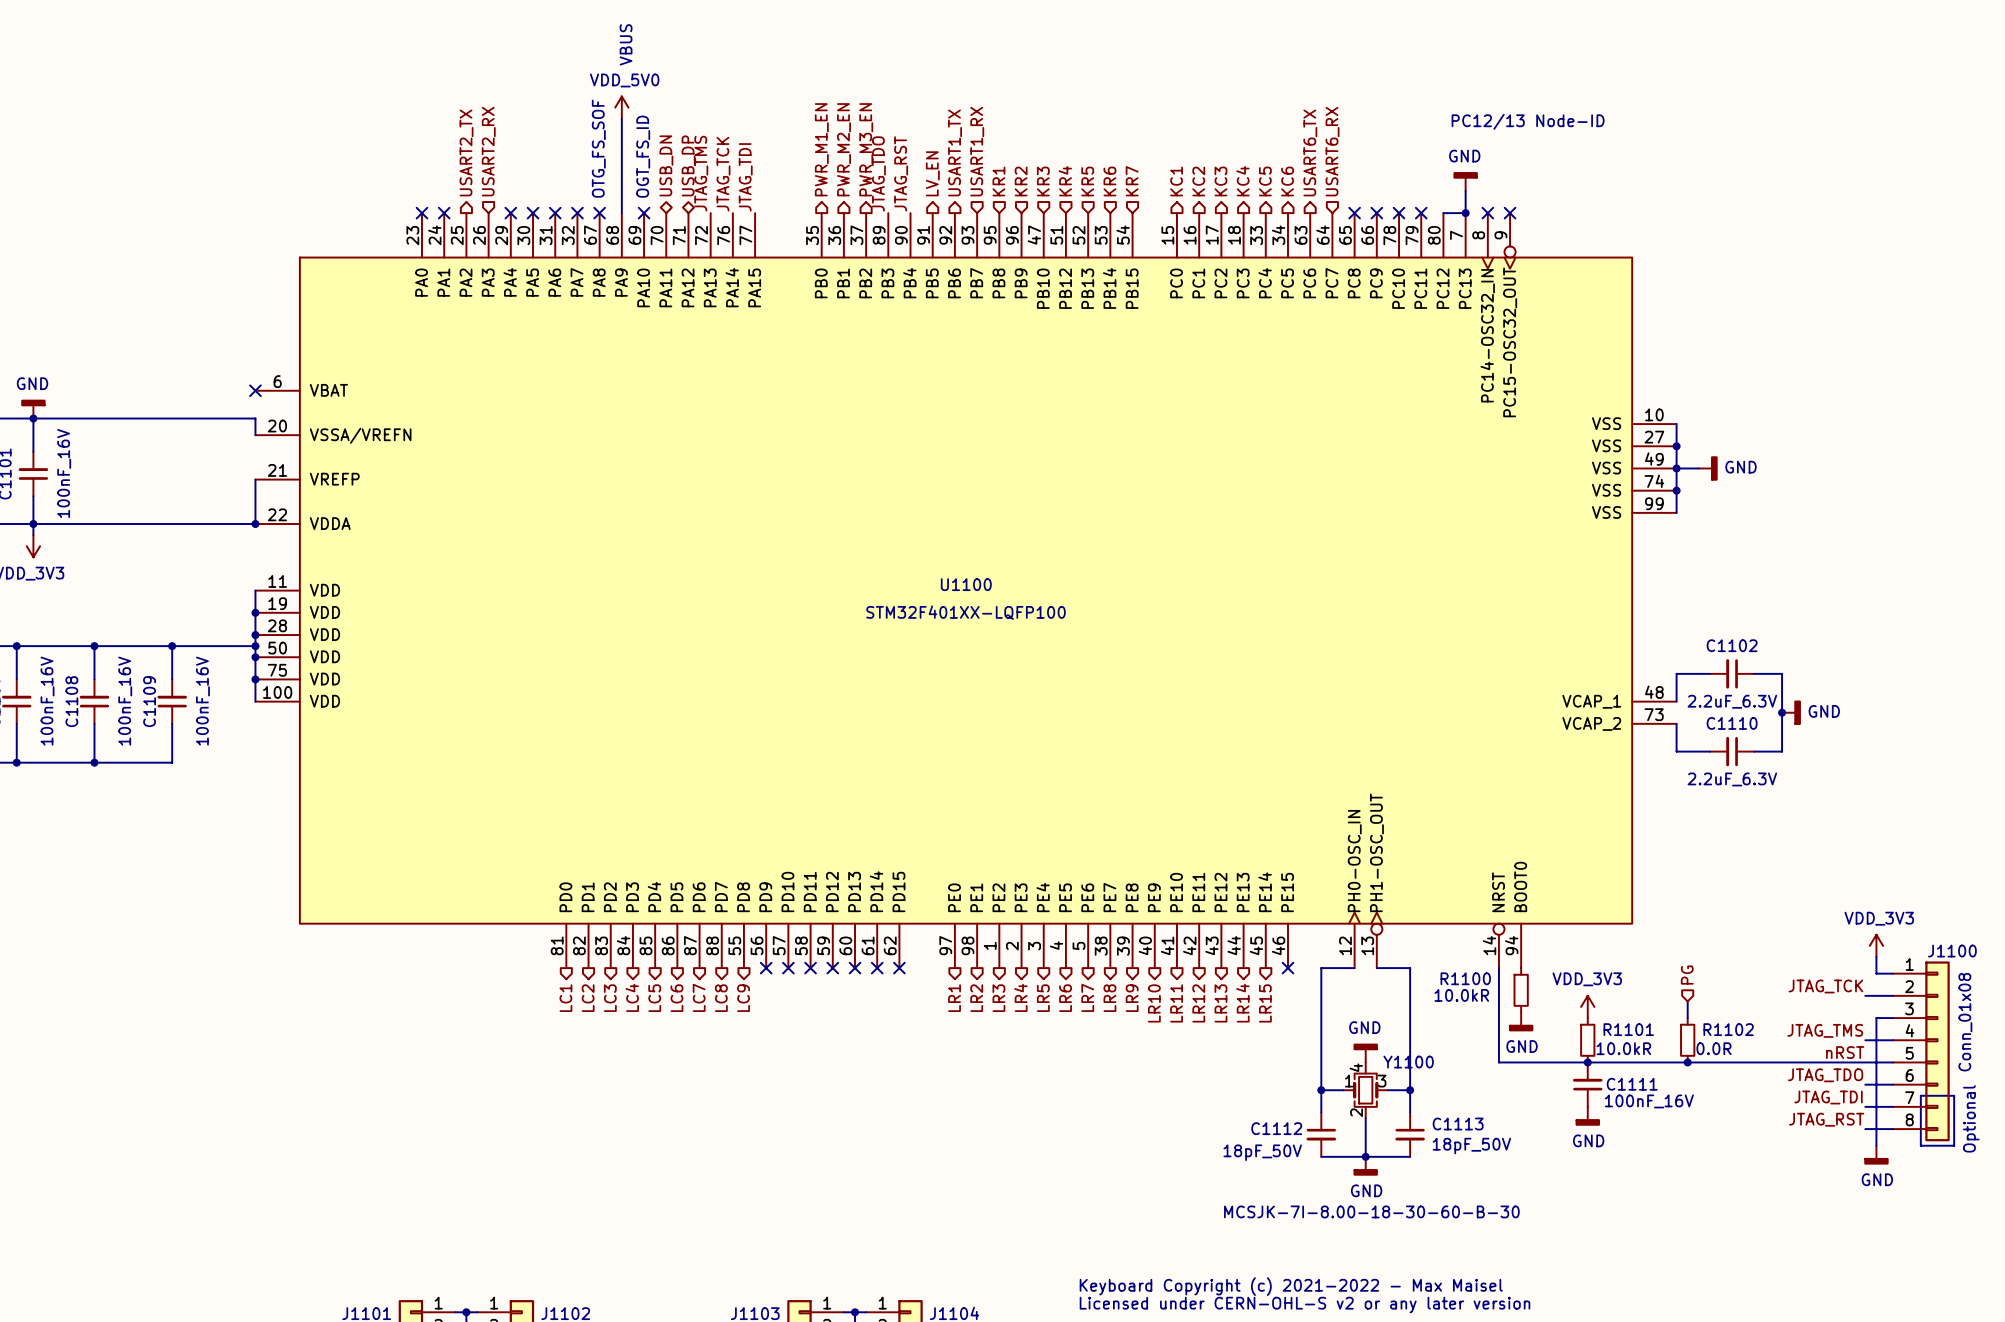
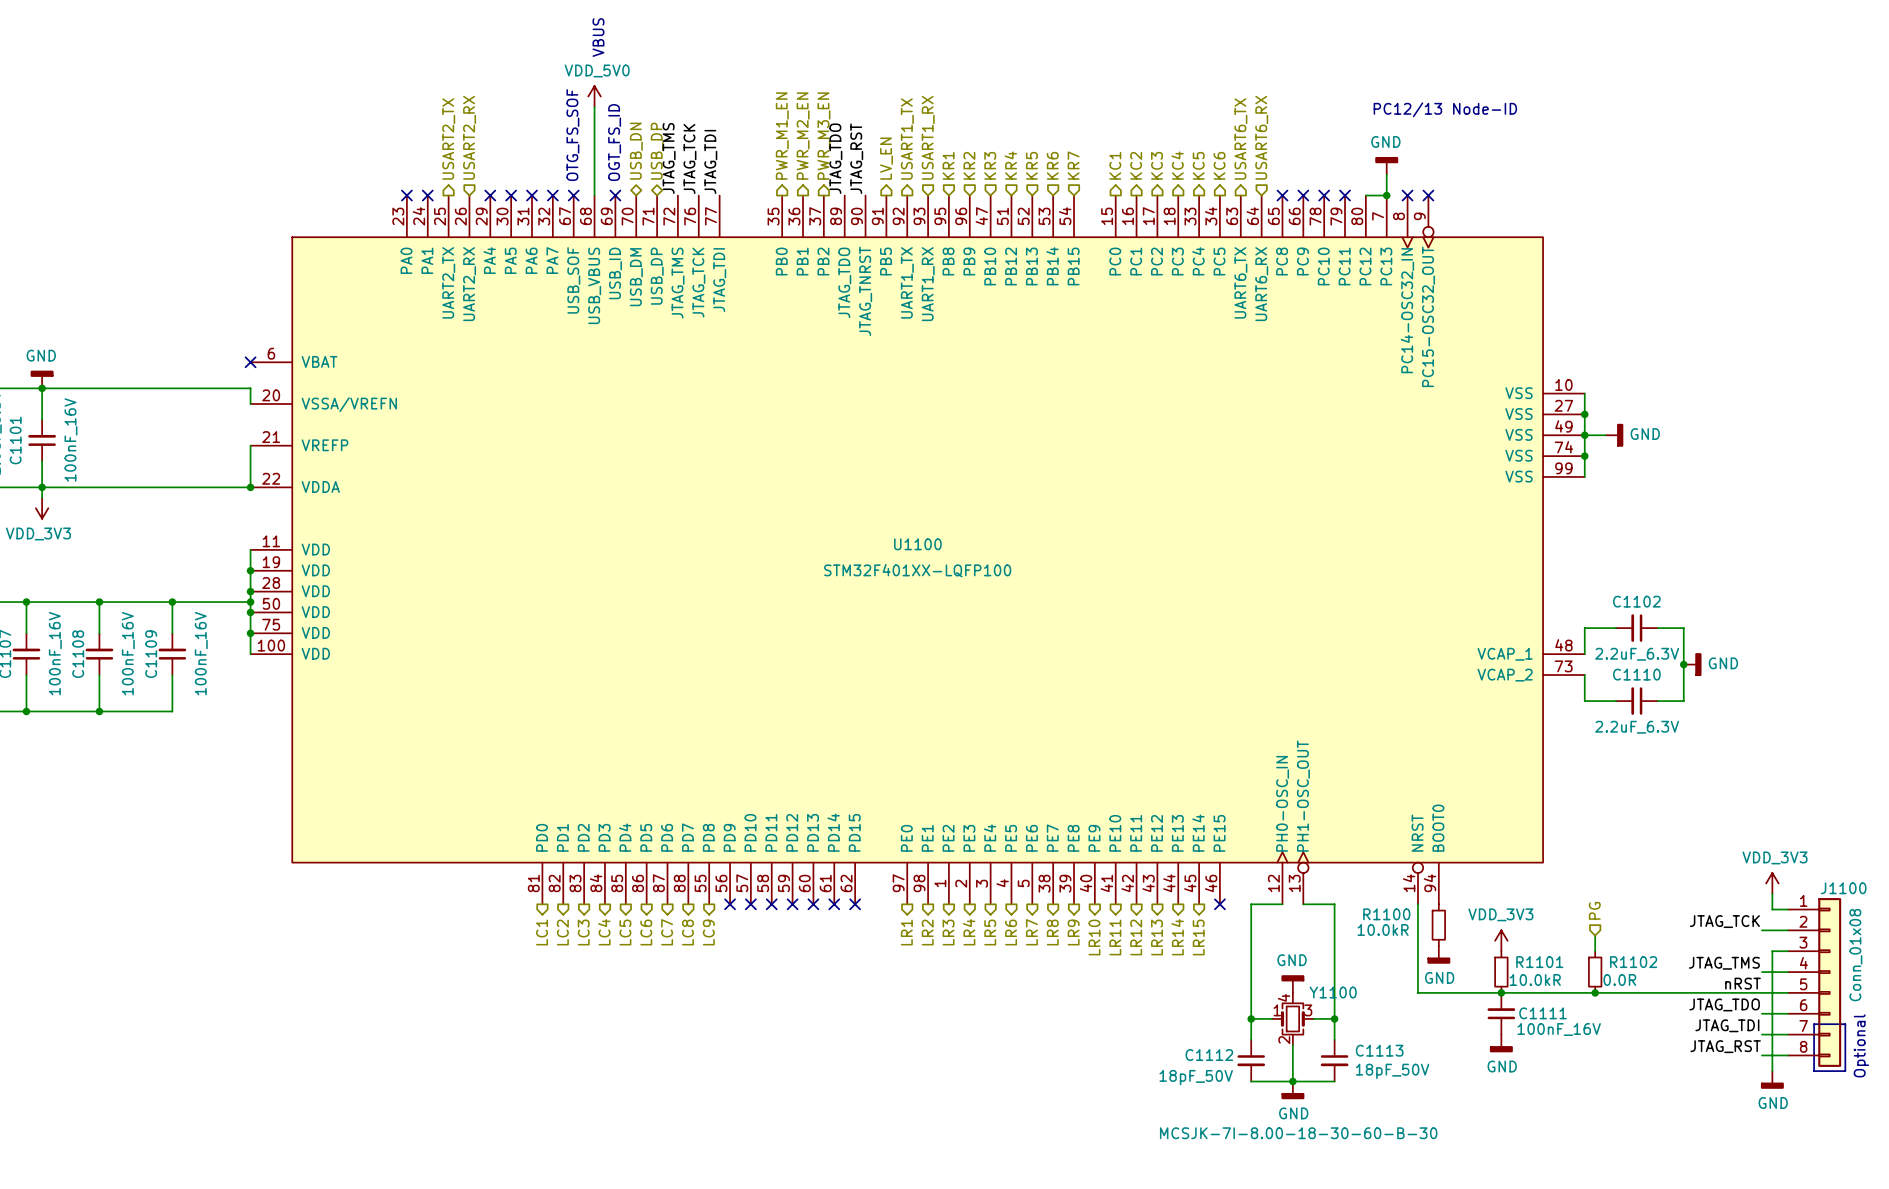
U1100 symbol: [255, 213, 1677, 969] -> [250, 195, 1585, 905]

